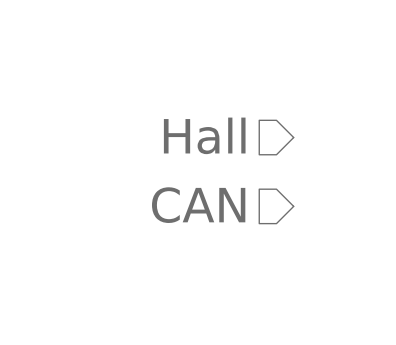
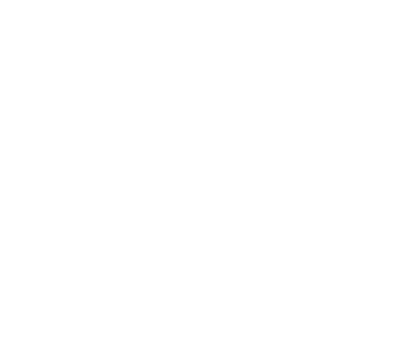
hierarchical label: Hall (204, 135) -> none
hierarchical label: CAN (198, 205) -> none

